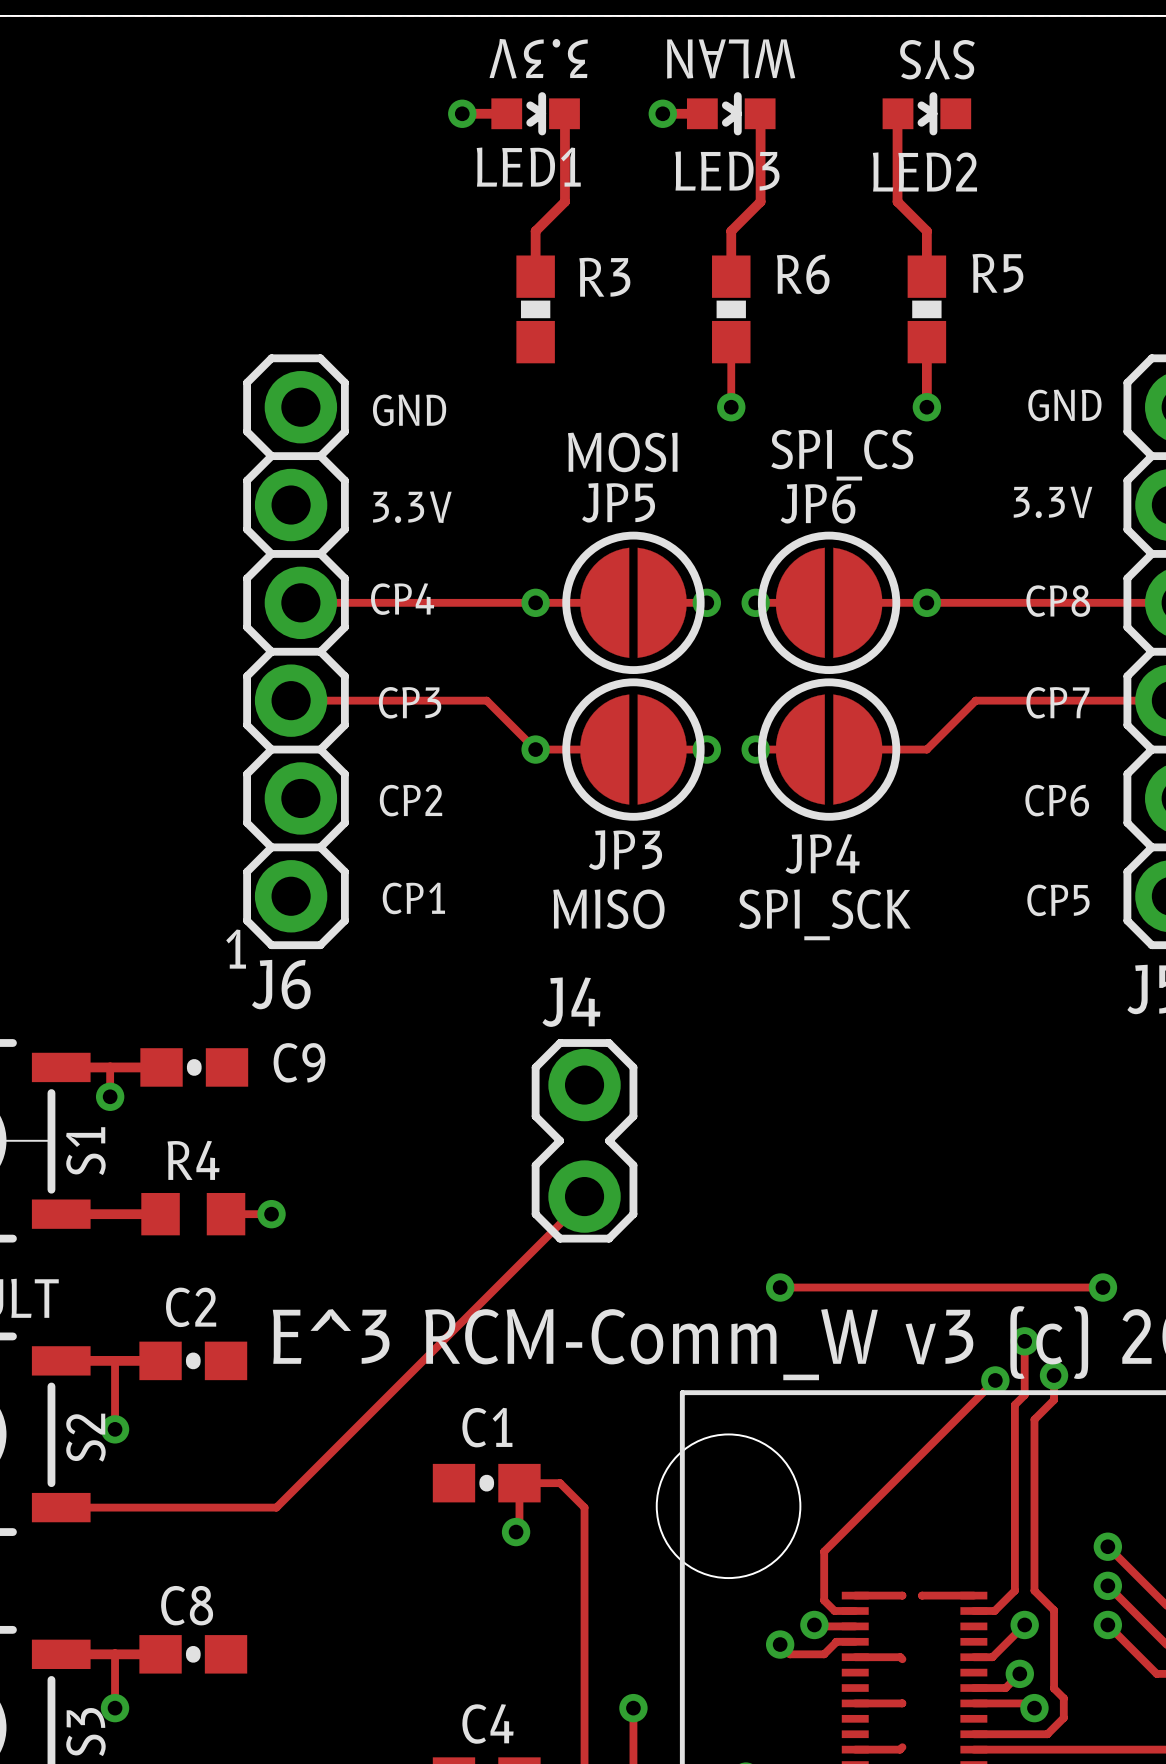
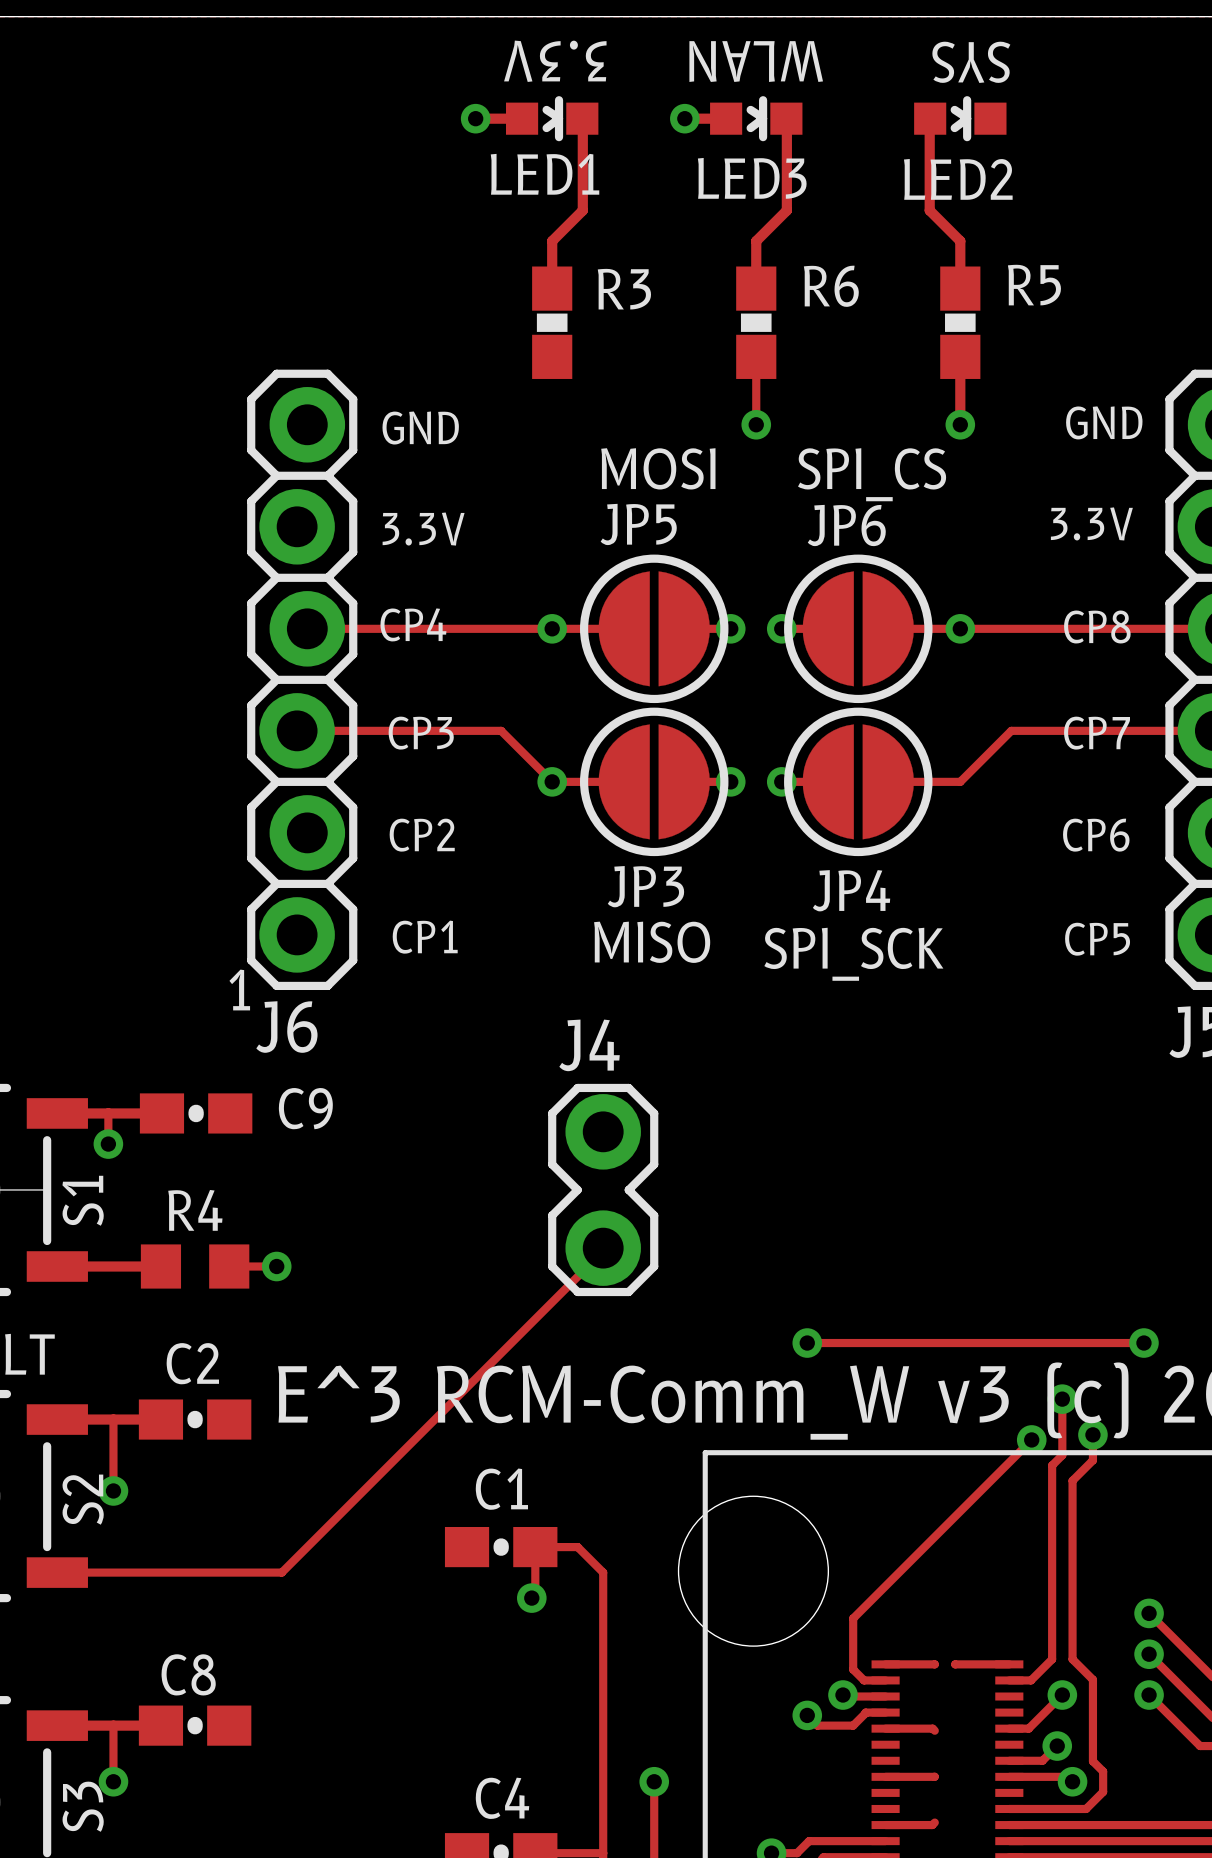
text position: MOSI (622, 452) -> MOSI (658, 468)
text position: MISO (608, 909) -> MISO (652, 942)

